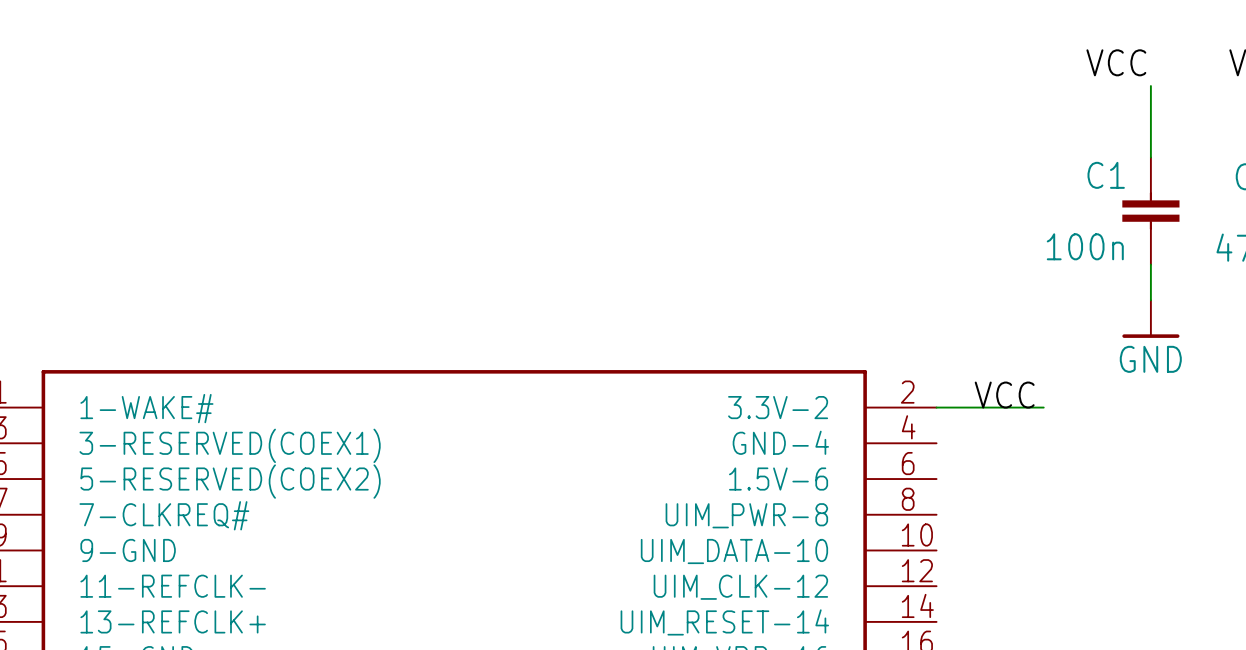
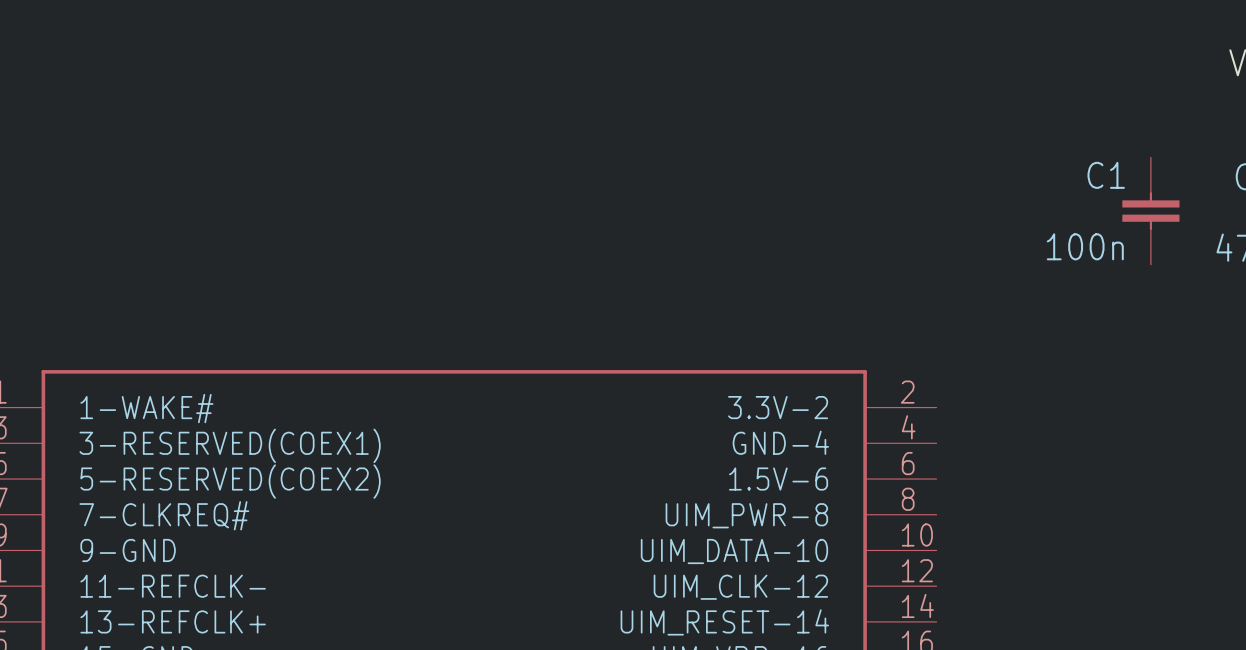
label: VCC (1116, 62) -> none
wire: (1150, 86) (1150, 157) -> none
wire: (1150, 264) (1150, 300) -> none
power symbol: GND (1150, 319) -> none
label: VCC (1004, 395) -> none
wire: (936, 407) (1043, 407) -> none

